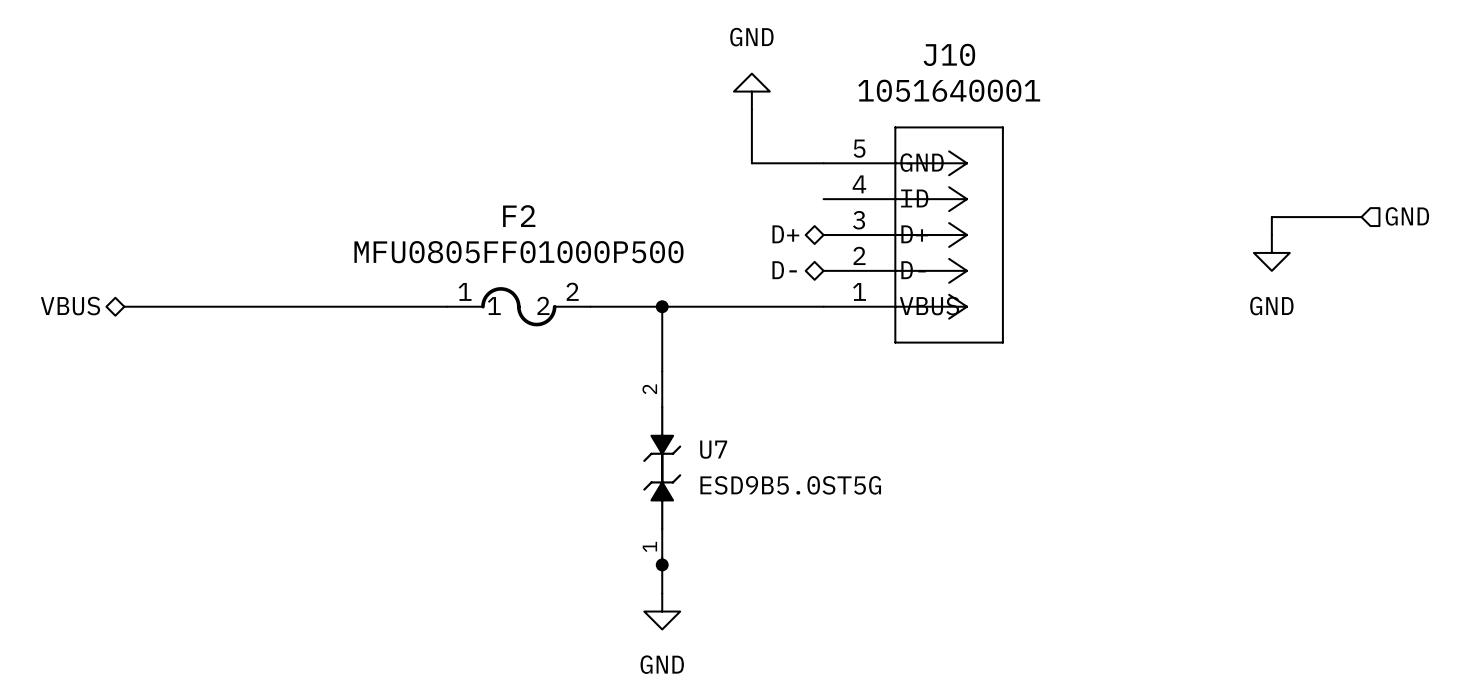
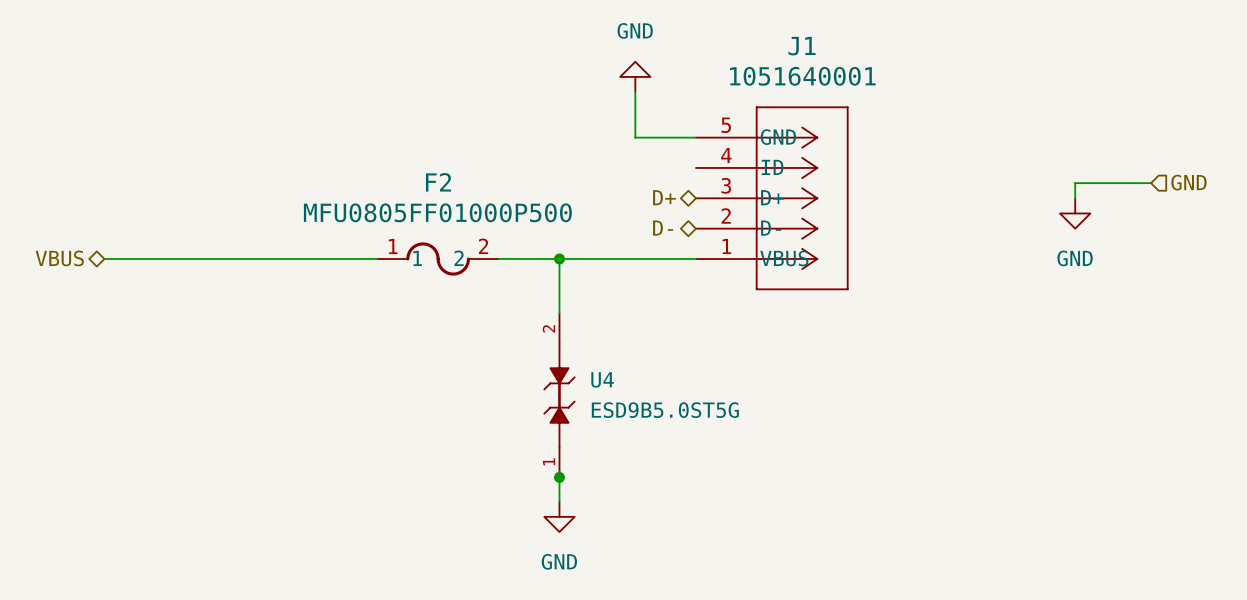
J10 name: J10 (949, 54) -> J1 (802, 46)
U7 name: U7 (713, 449) -> U4 (602, 379)

